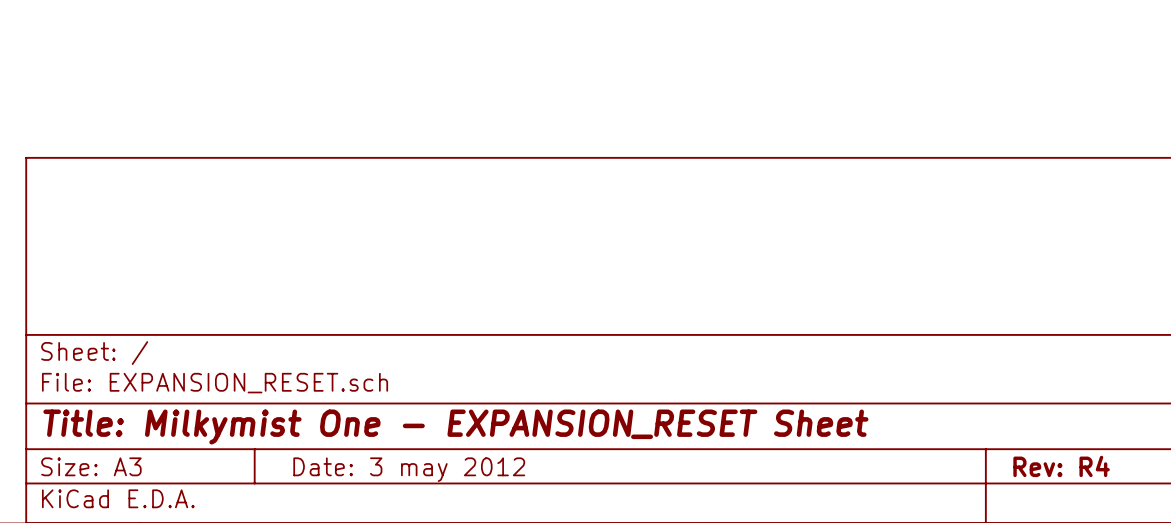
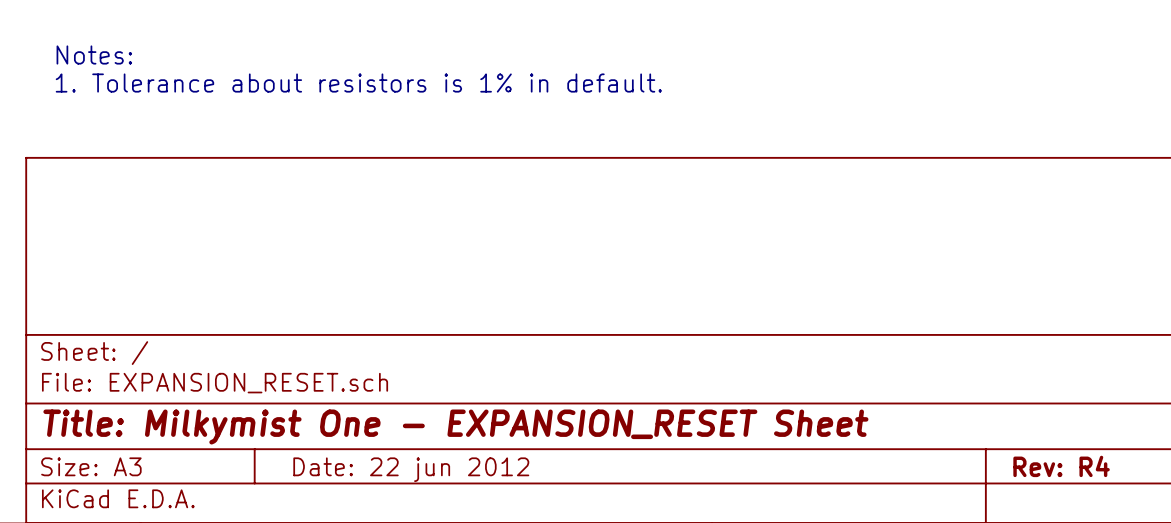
text: none -> Notes: (94, 54)
text: none -> 1. Tolerance about resistors is 1% in default. (358, 83)
title block: Date: 3 may 2012 (409, 469) -> Date: 22 jun 2012 (411, 469)

